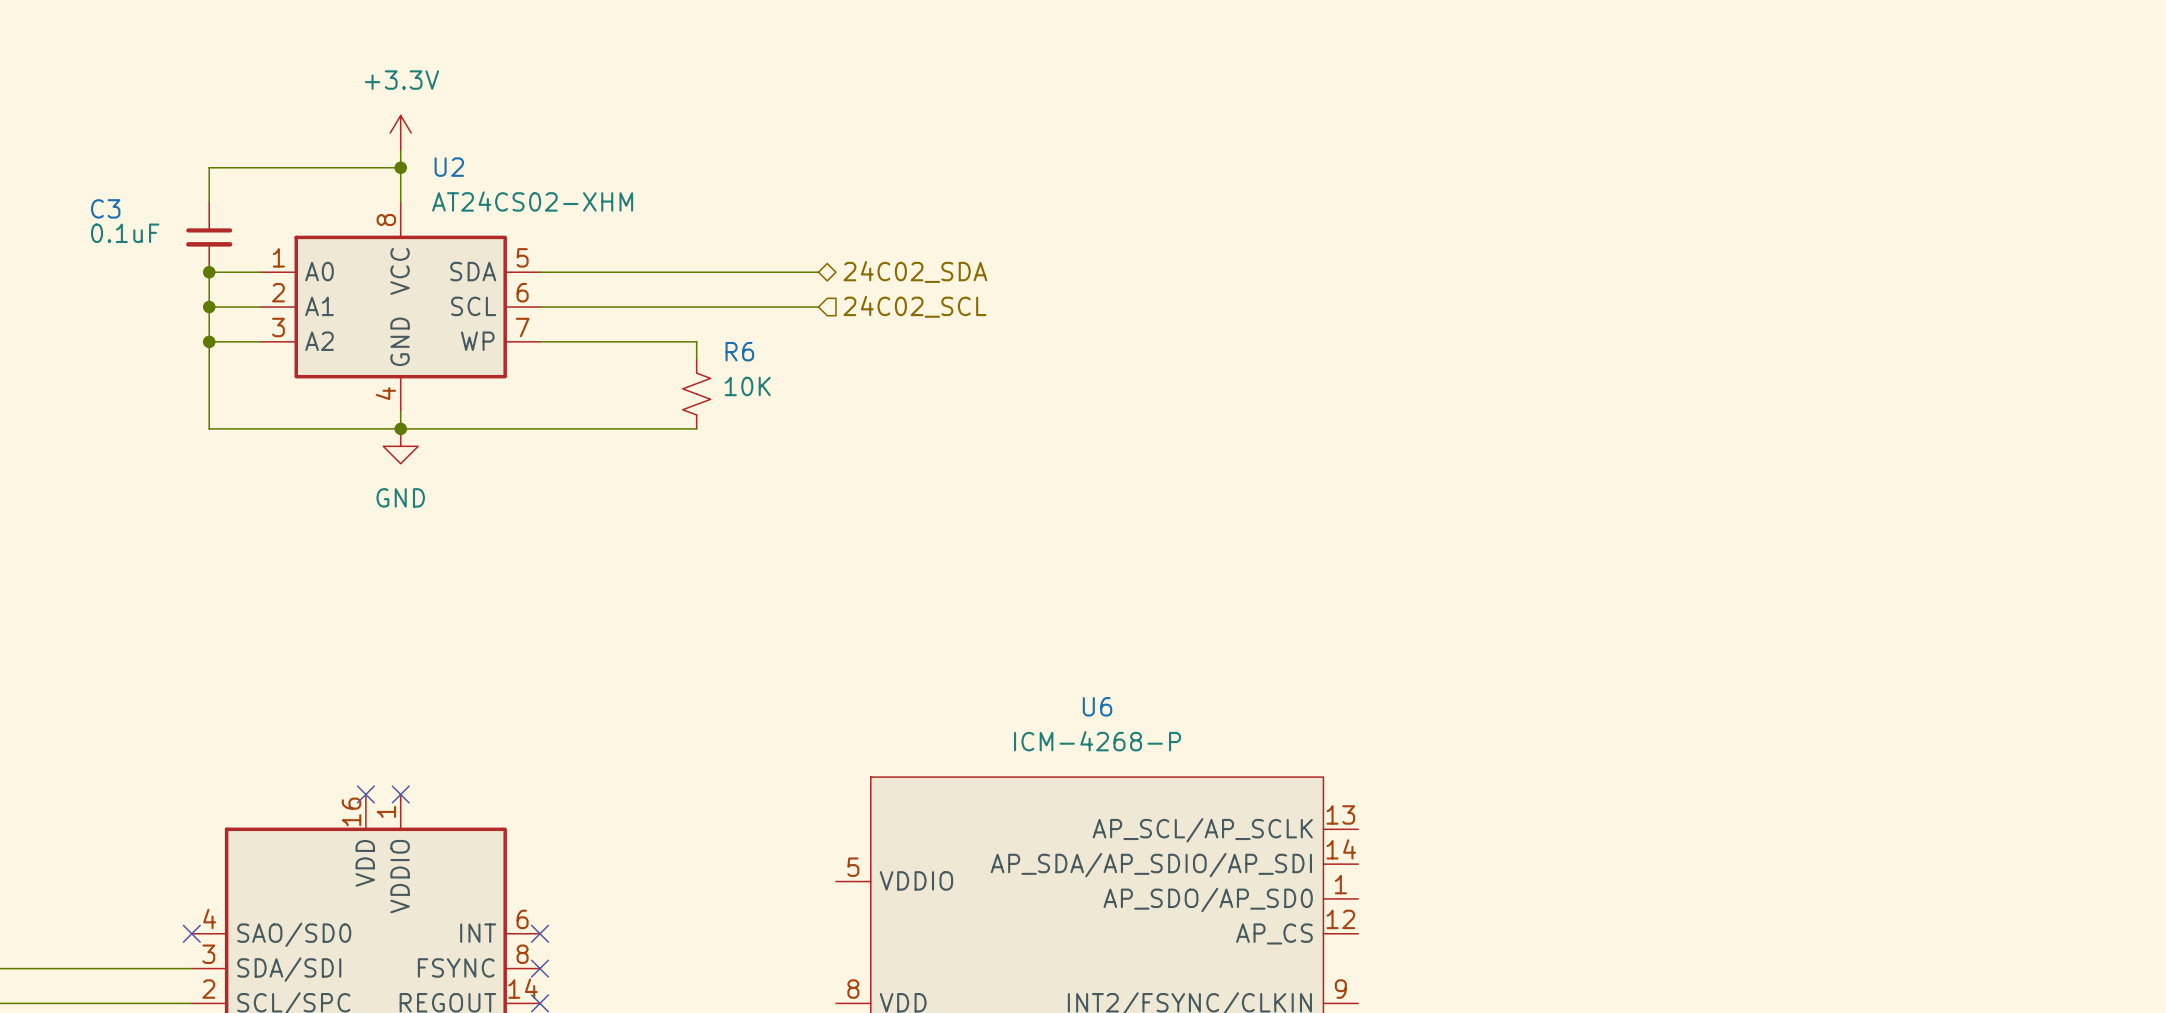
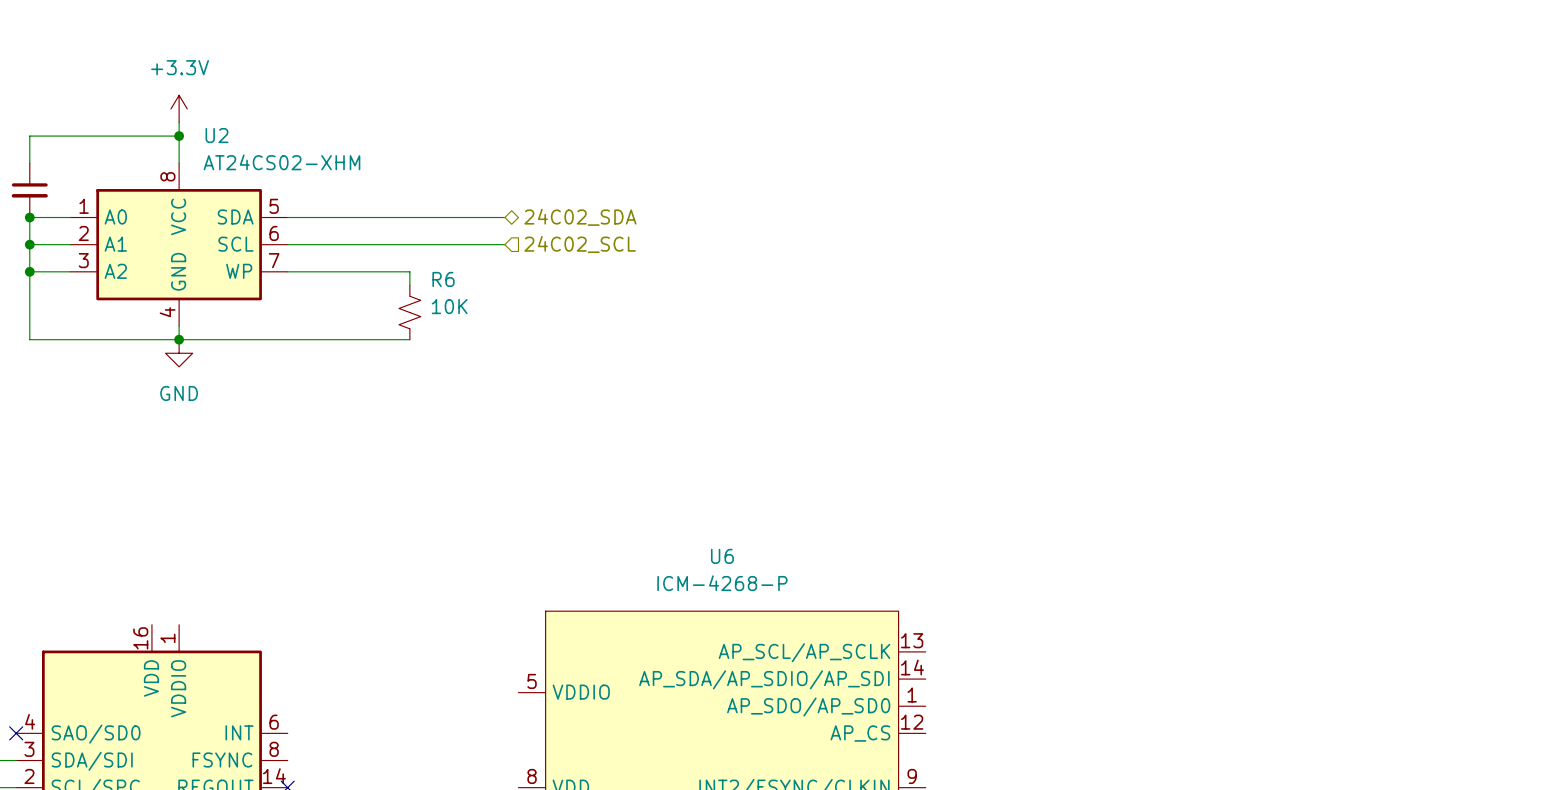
no-connect mark: (365, 794) -> none
no-connect mark: (400, 794) -> none
no-connect mark: (540, 933) -> none
no-connect mark: (540, 968) -> none

